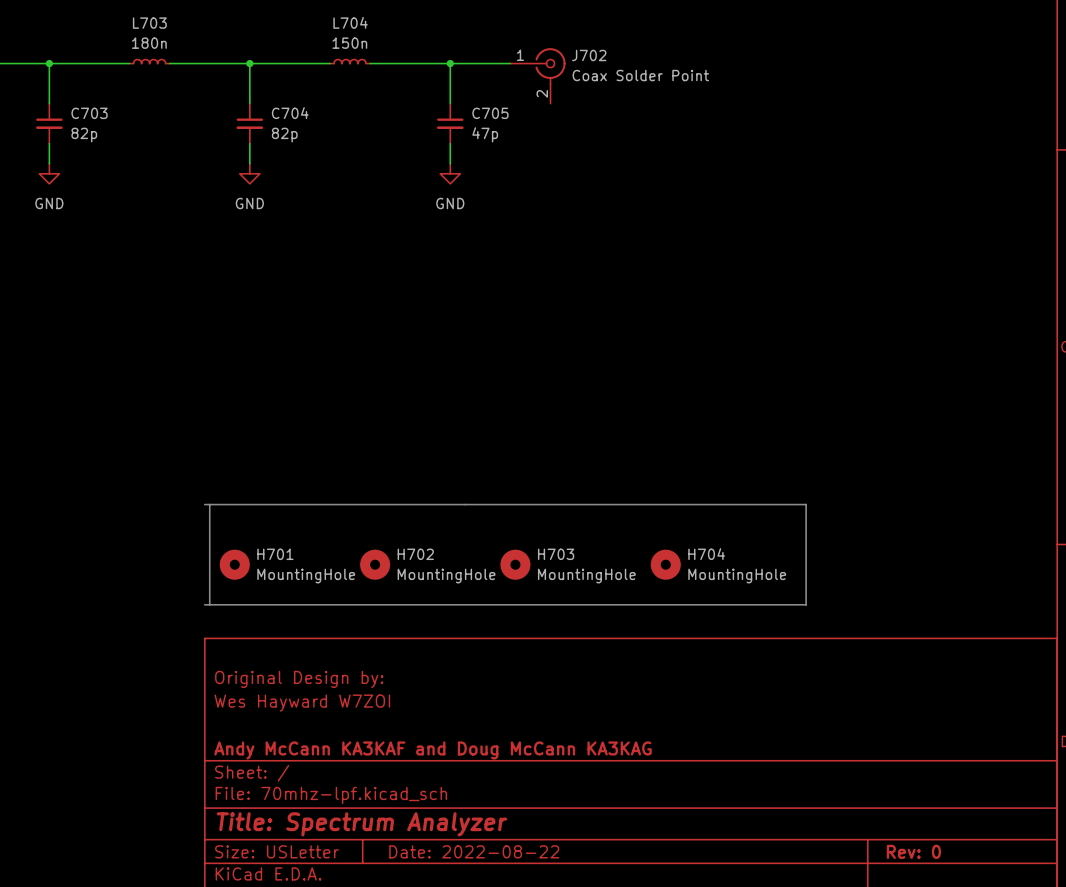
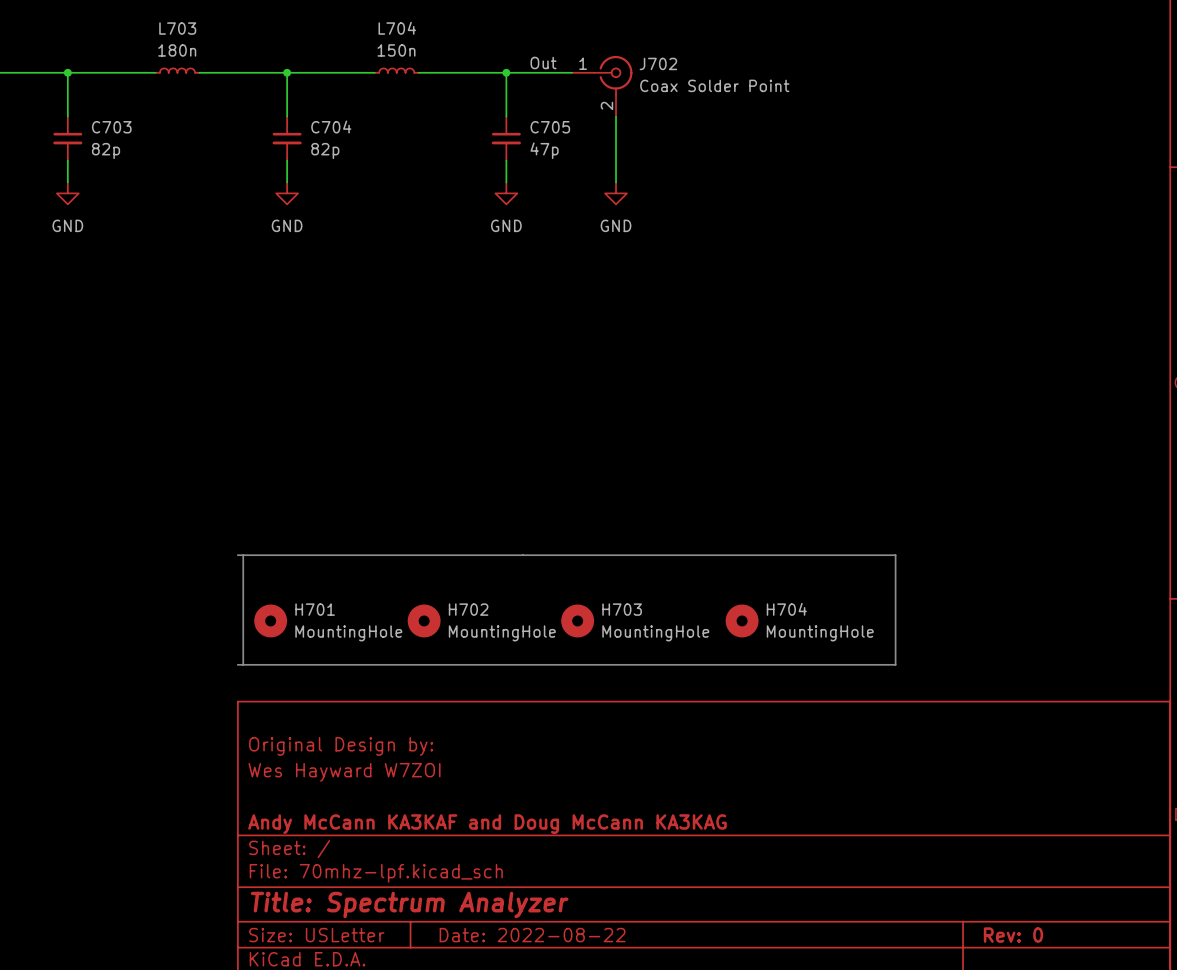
label: none -> Out (543, 63)
wire: none -> (616, 116) (616, 182)
power symbol: none -> GND (616, 193)

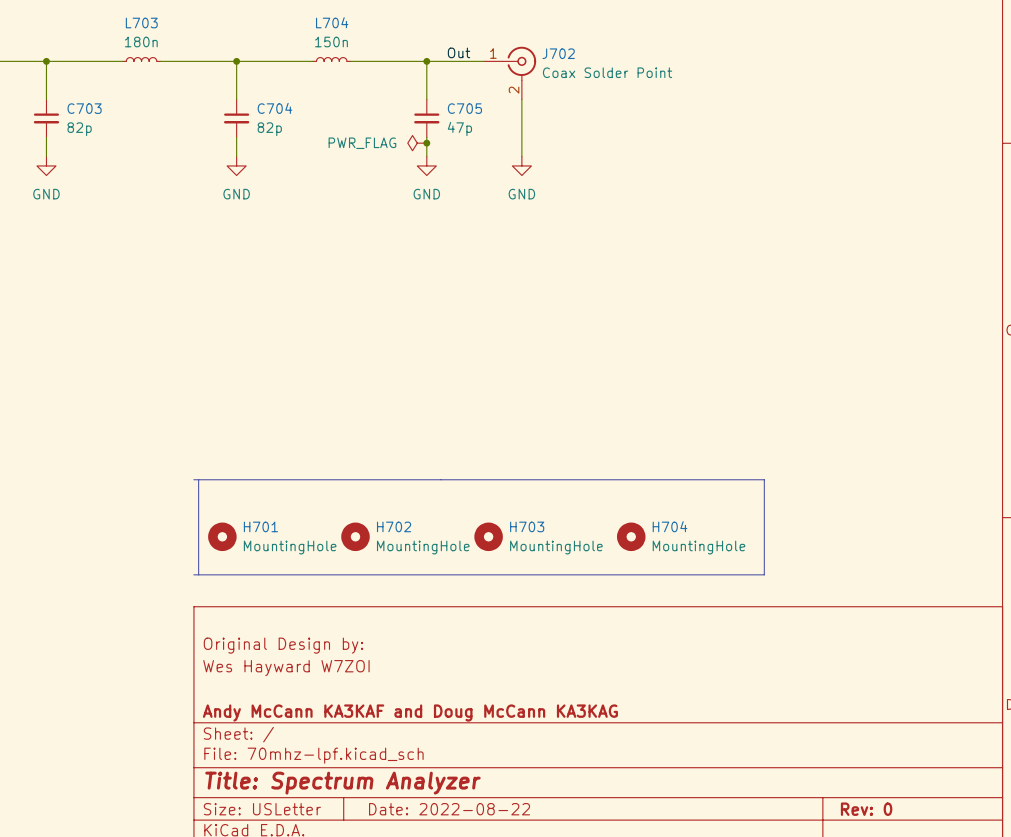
power symbol: none -> PWR_FLAG (417, 143)
junction: none -> (426, 143)

